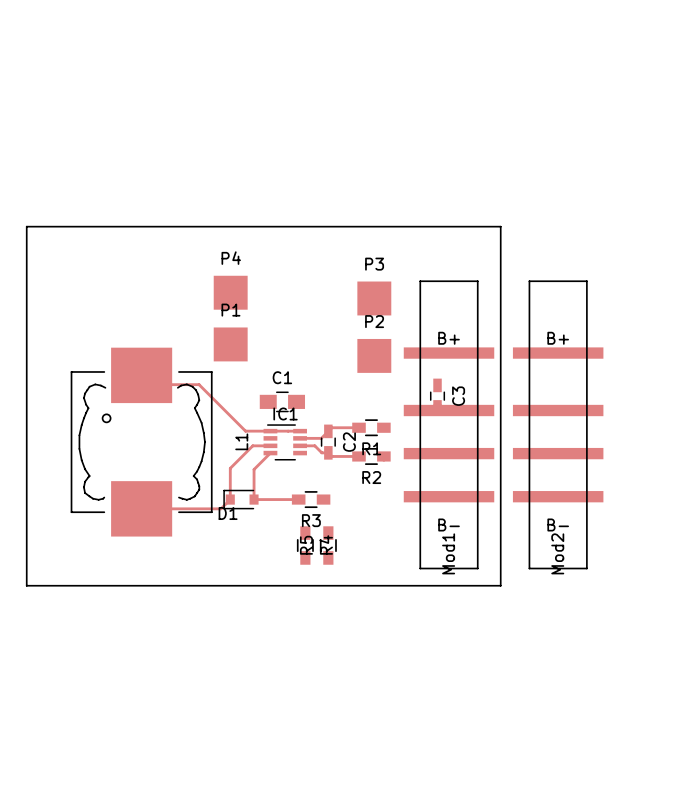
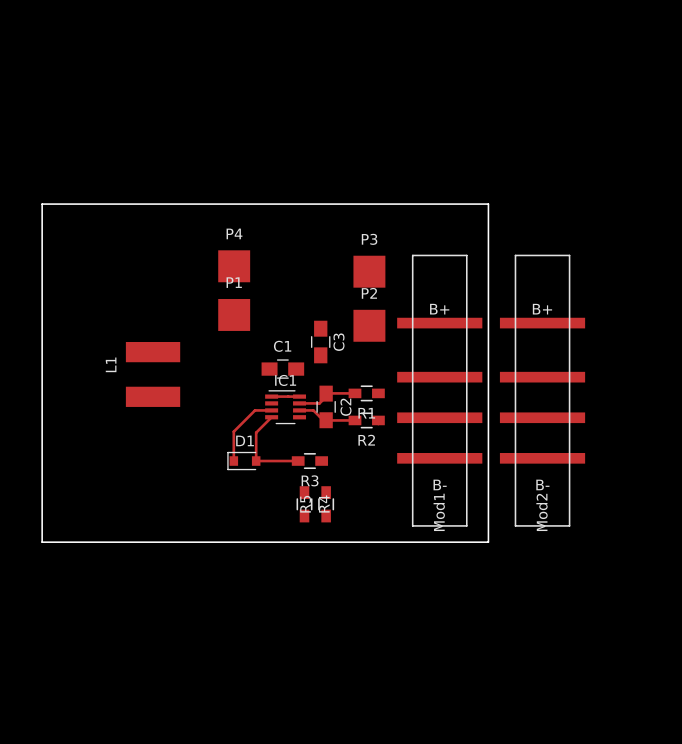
L1 footprint: [70, 347, 213, 537] -> [125, 341, 181, 407]
top track: (141, 375) (150, 384) (199, 384) (245, 431) (270, 431) -> none
C3 footprint: [430, 378, 445, 414] -> [311, 320, 331, 364]
C2 footprint: [320, 424, 336, 460] -> [316, 385, 336, 429]
L1 name position: L1 (241, 441) -> L1 (111, 364)
top track: (230, 499) (221, 508) (141, 508) -> none
D1 name position: D1 (228, 513) -> D1 (245, 440)

